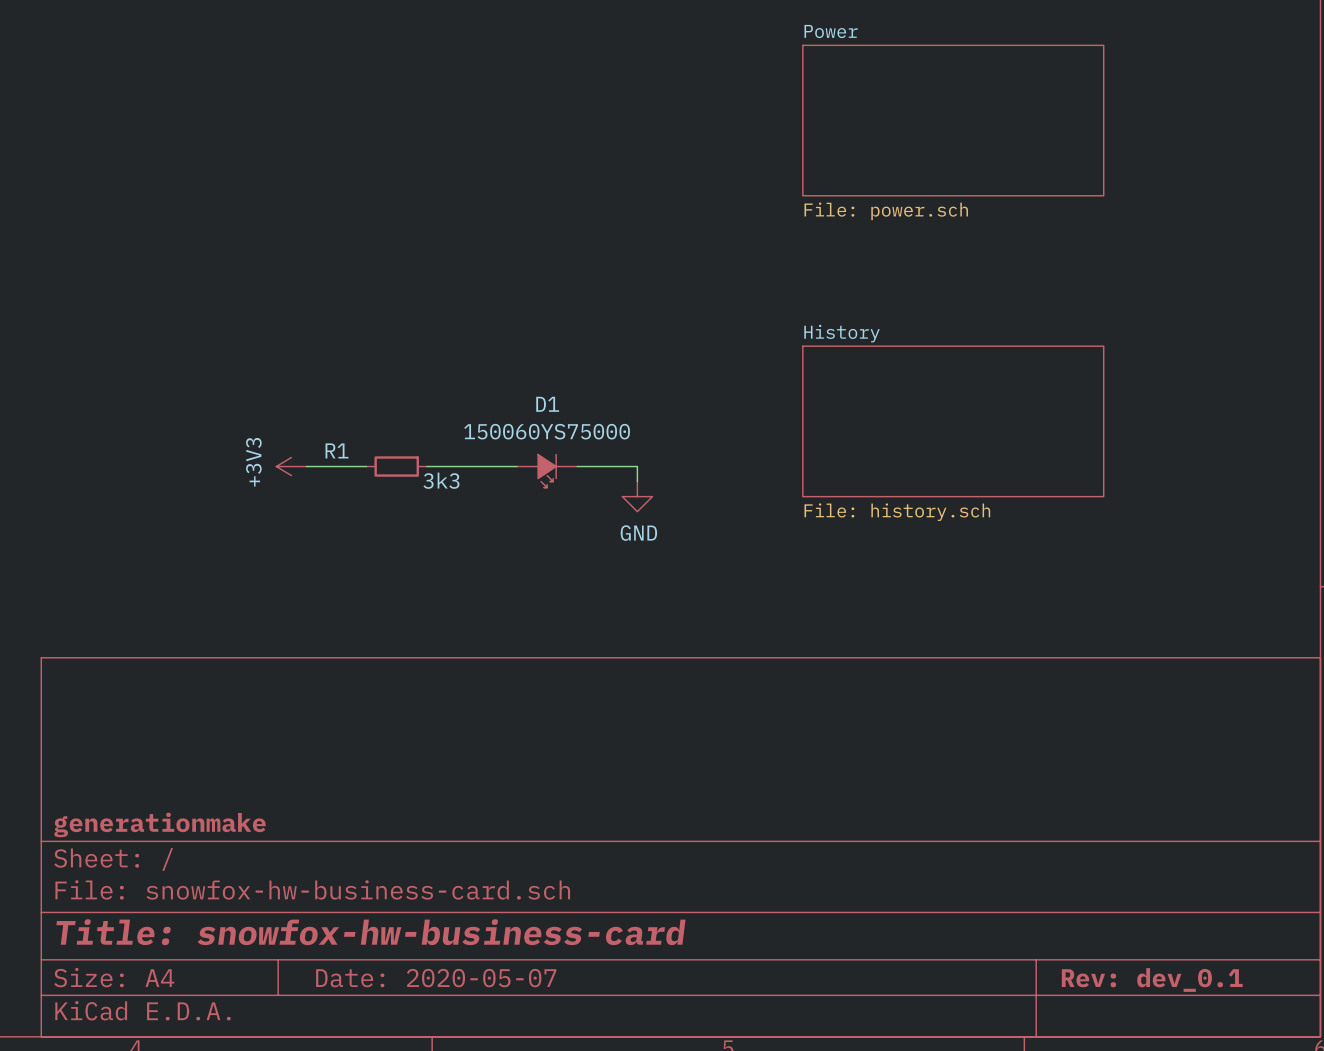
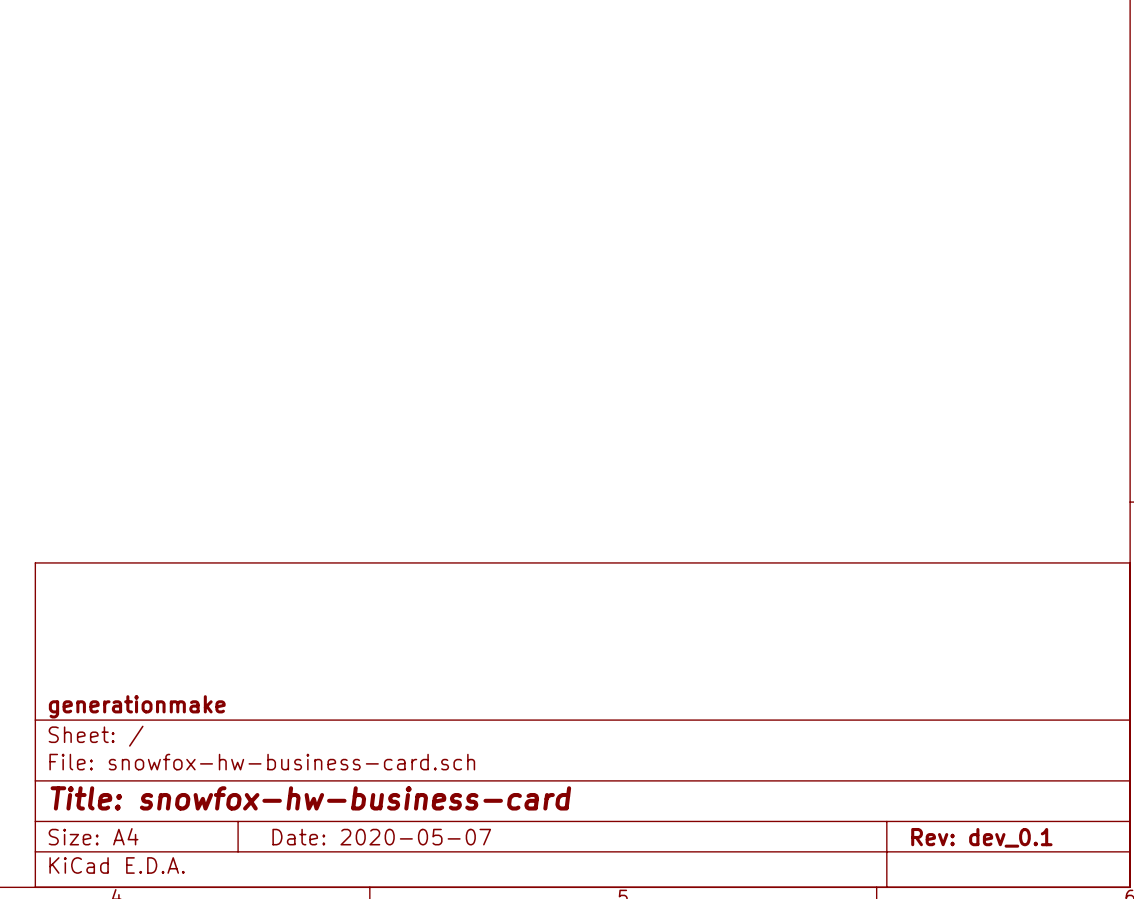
sheet Power: File: power.sch (953, 120) -> none
sheet History: File: history.sch (953, 421) -> none
power symbol: +3V3 (291, 466) -> none
wire: (306, 466) (366, 466) -> none
R1: 3k3 (396, 466) -> none
wire: (426, 466) (517, 466) -> none
wire: (577, 466) (637, 466) (637, 481) -> none
D1: 150060YS75000 (547, 471) -> none
power symbol: GND (637, 496) -> none

